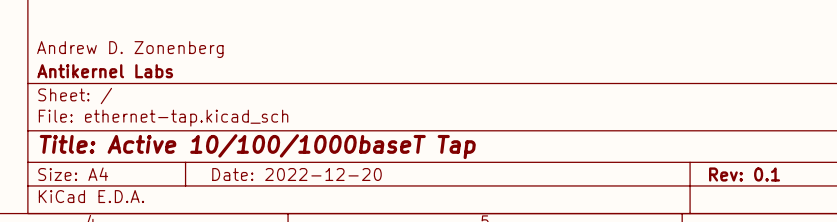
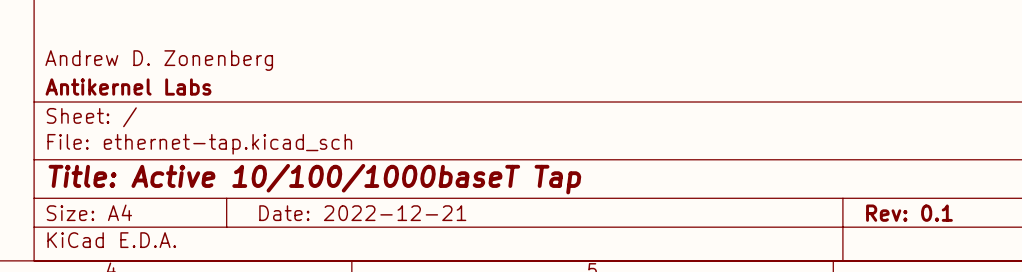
title block: Date: 2022-12-20 (296, 174) -> Date: 2022-12-21 (362, 213)

